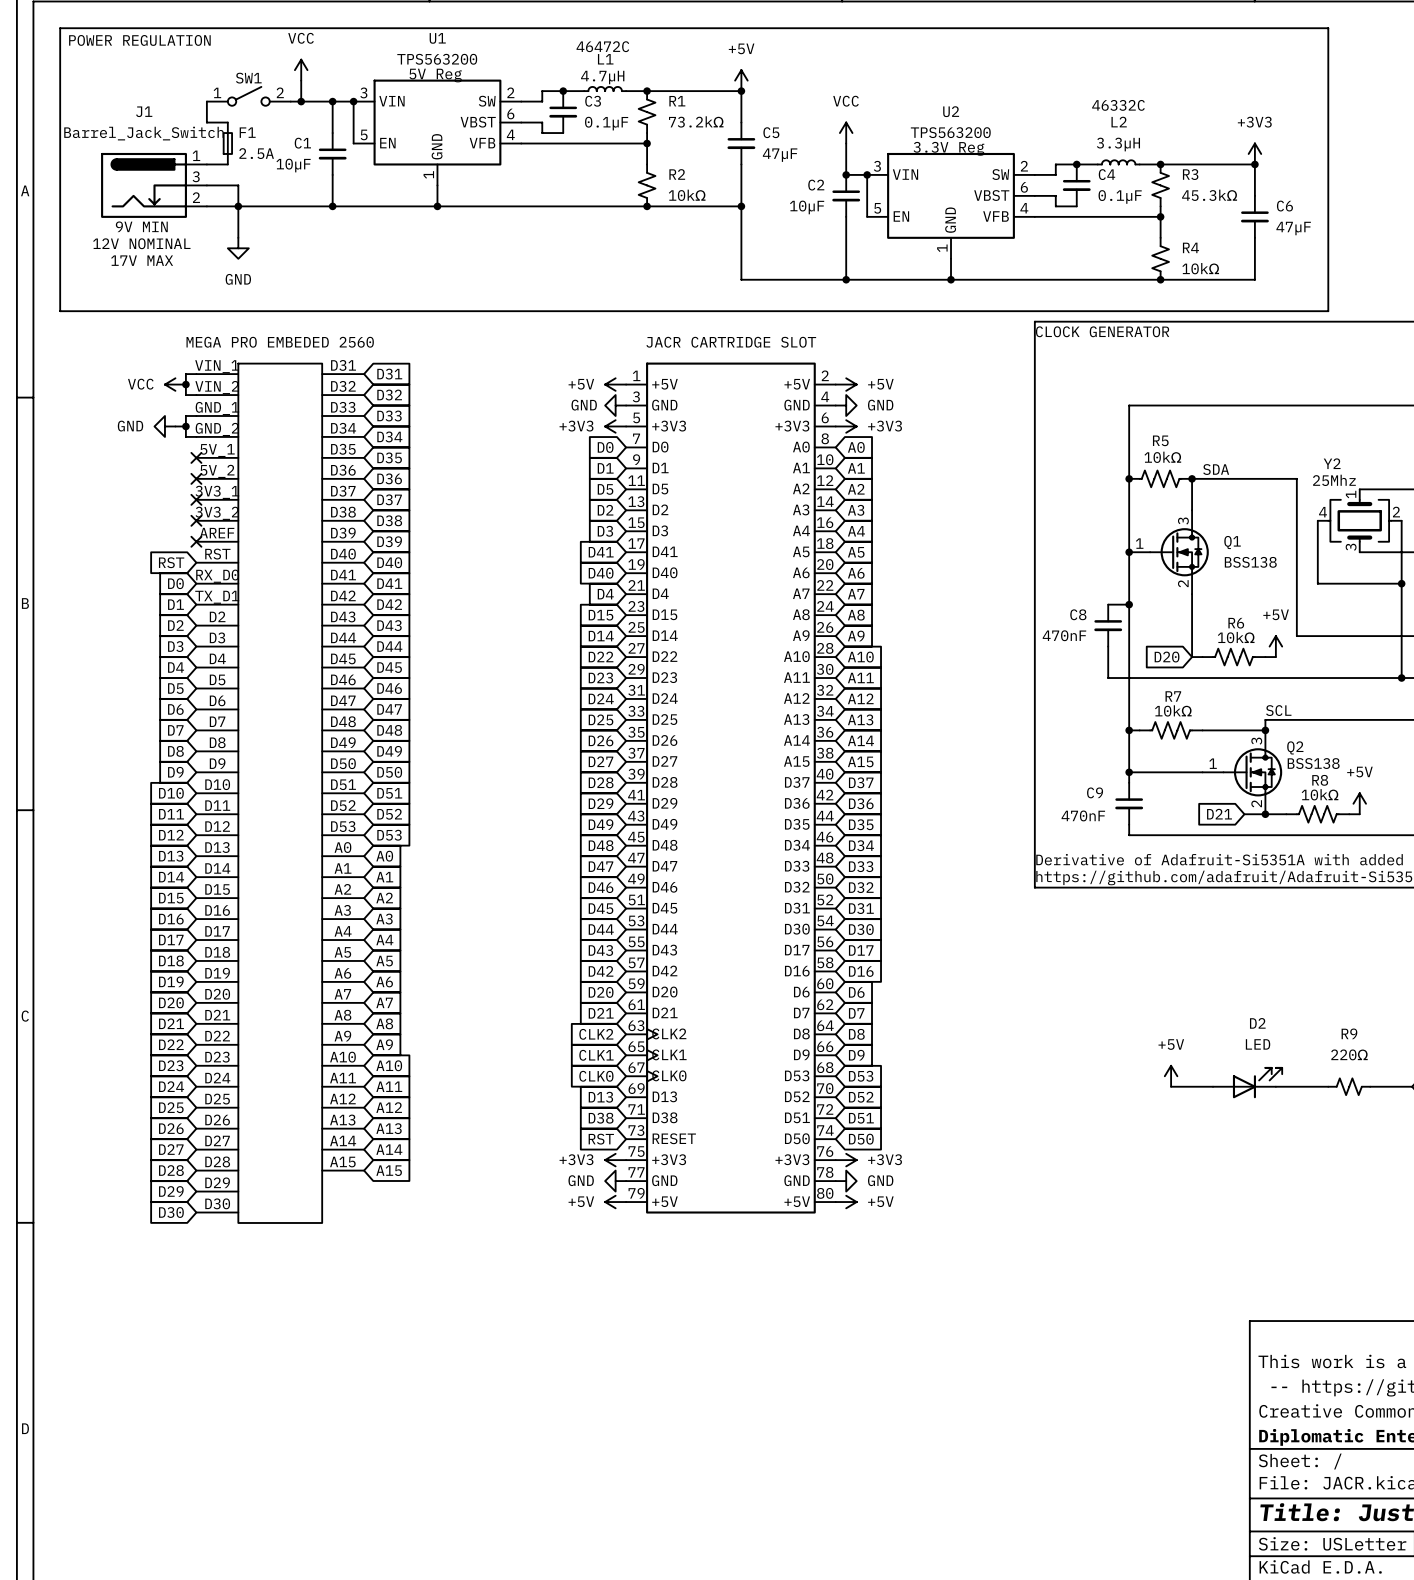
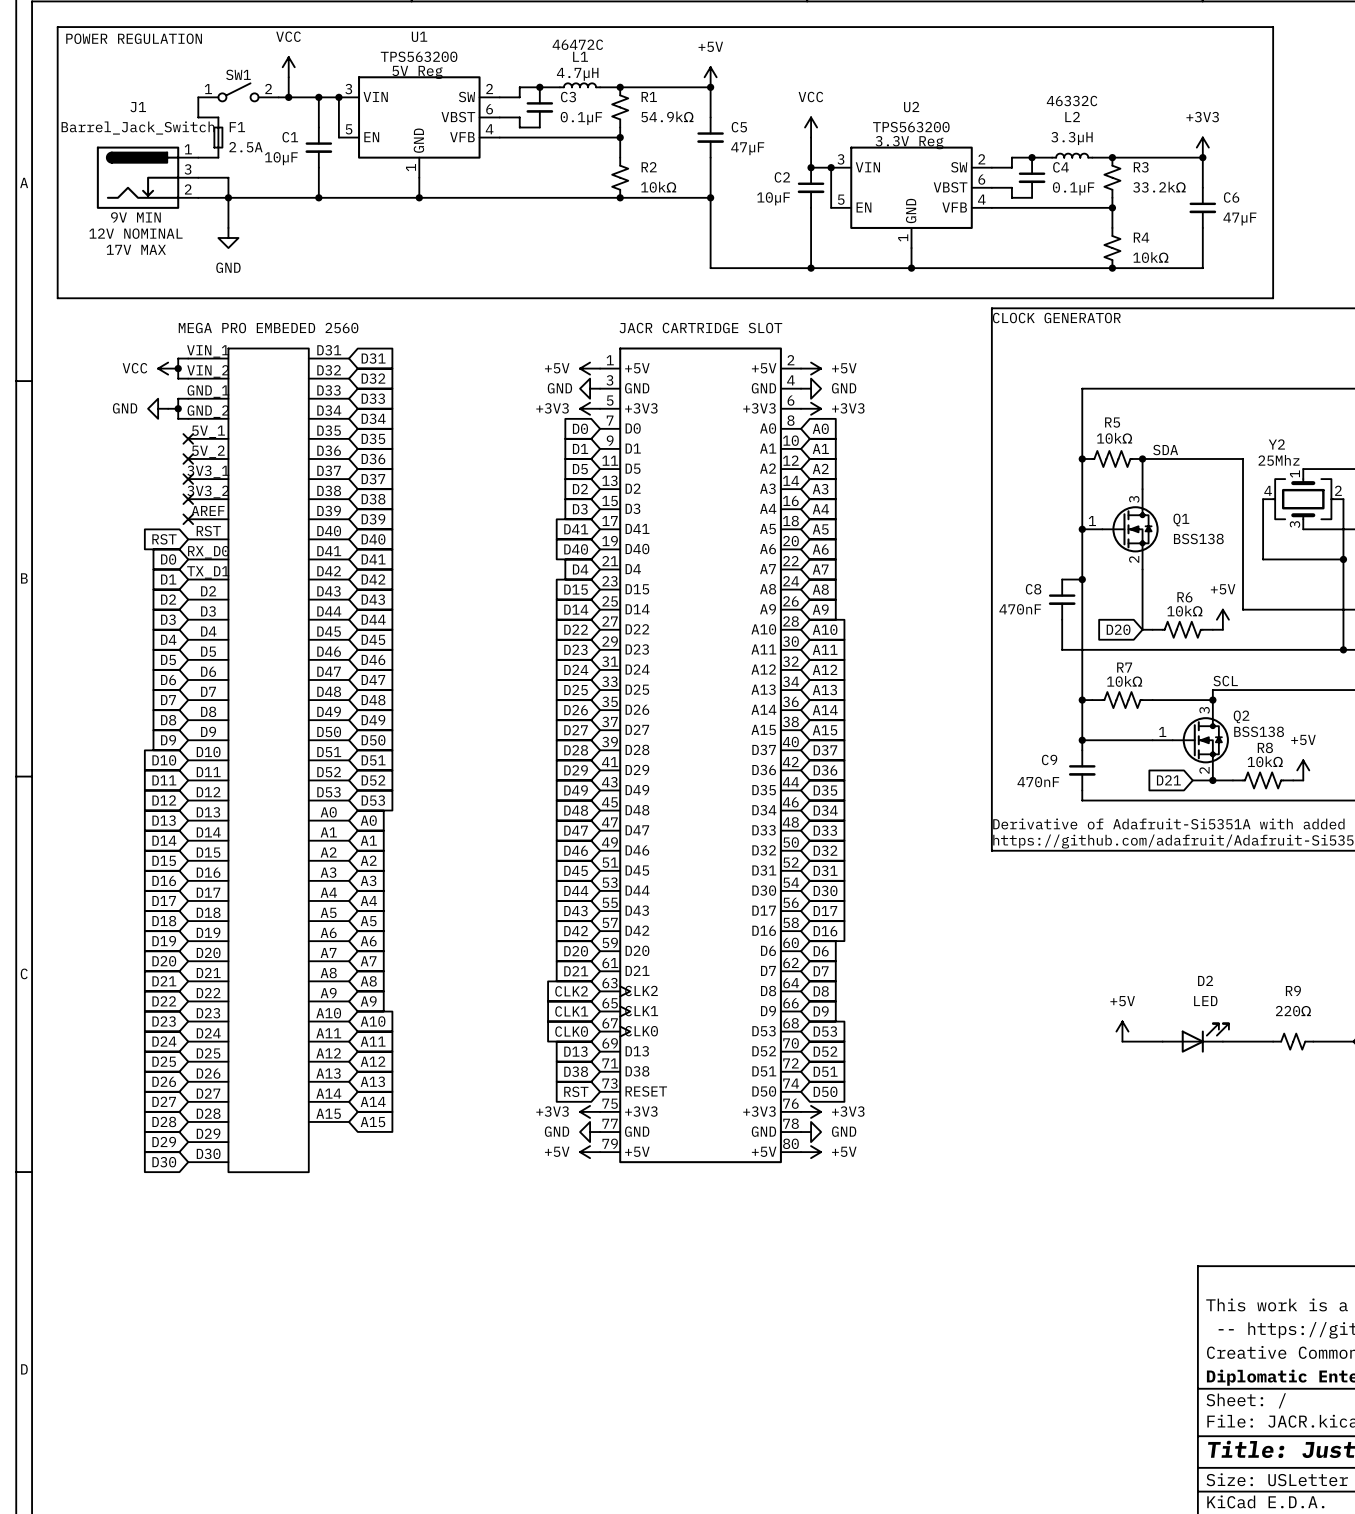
R1 value: 73.2kΩ (696, 121) -> 54.9kΩ (667, 116)
R3 value: 45.3kΩ (1209, 195) -> 33.2kΩ (1159, 187)

